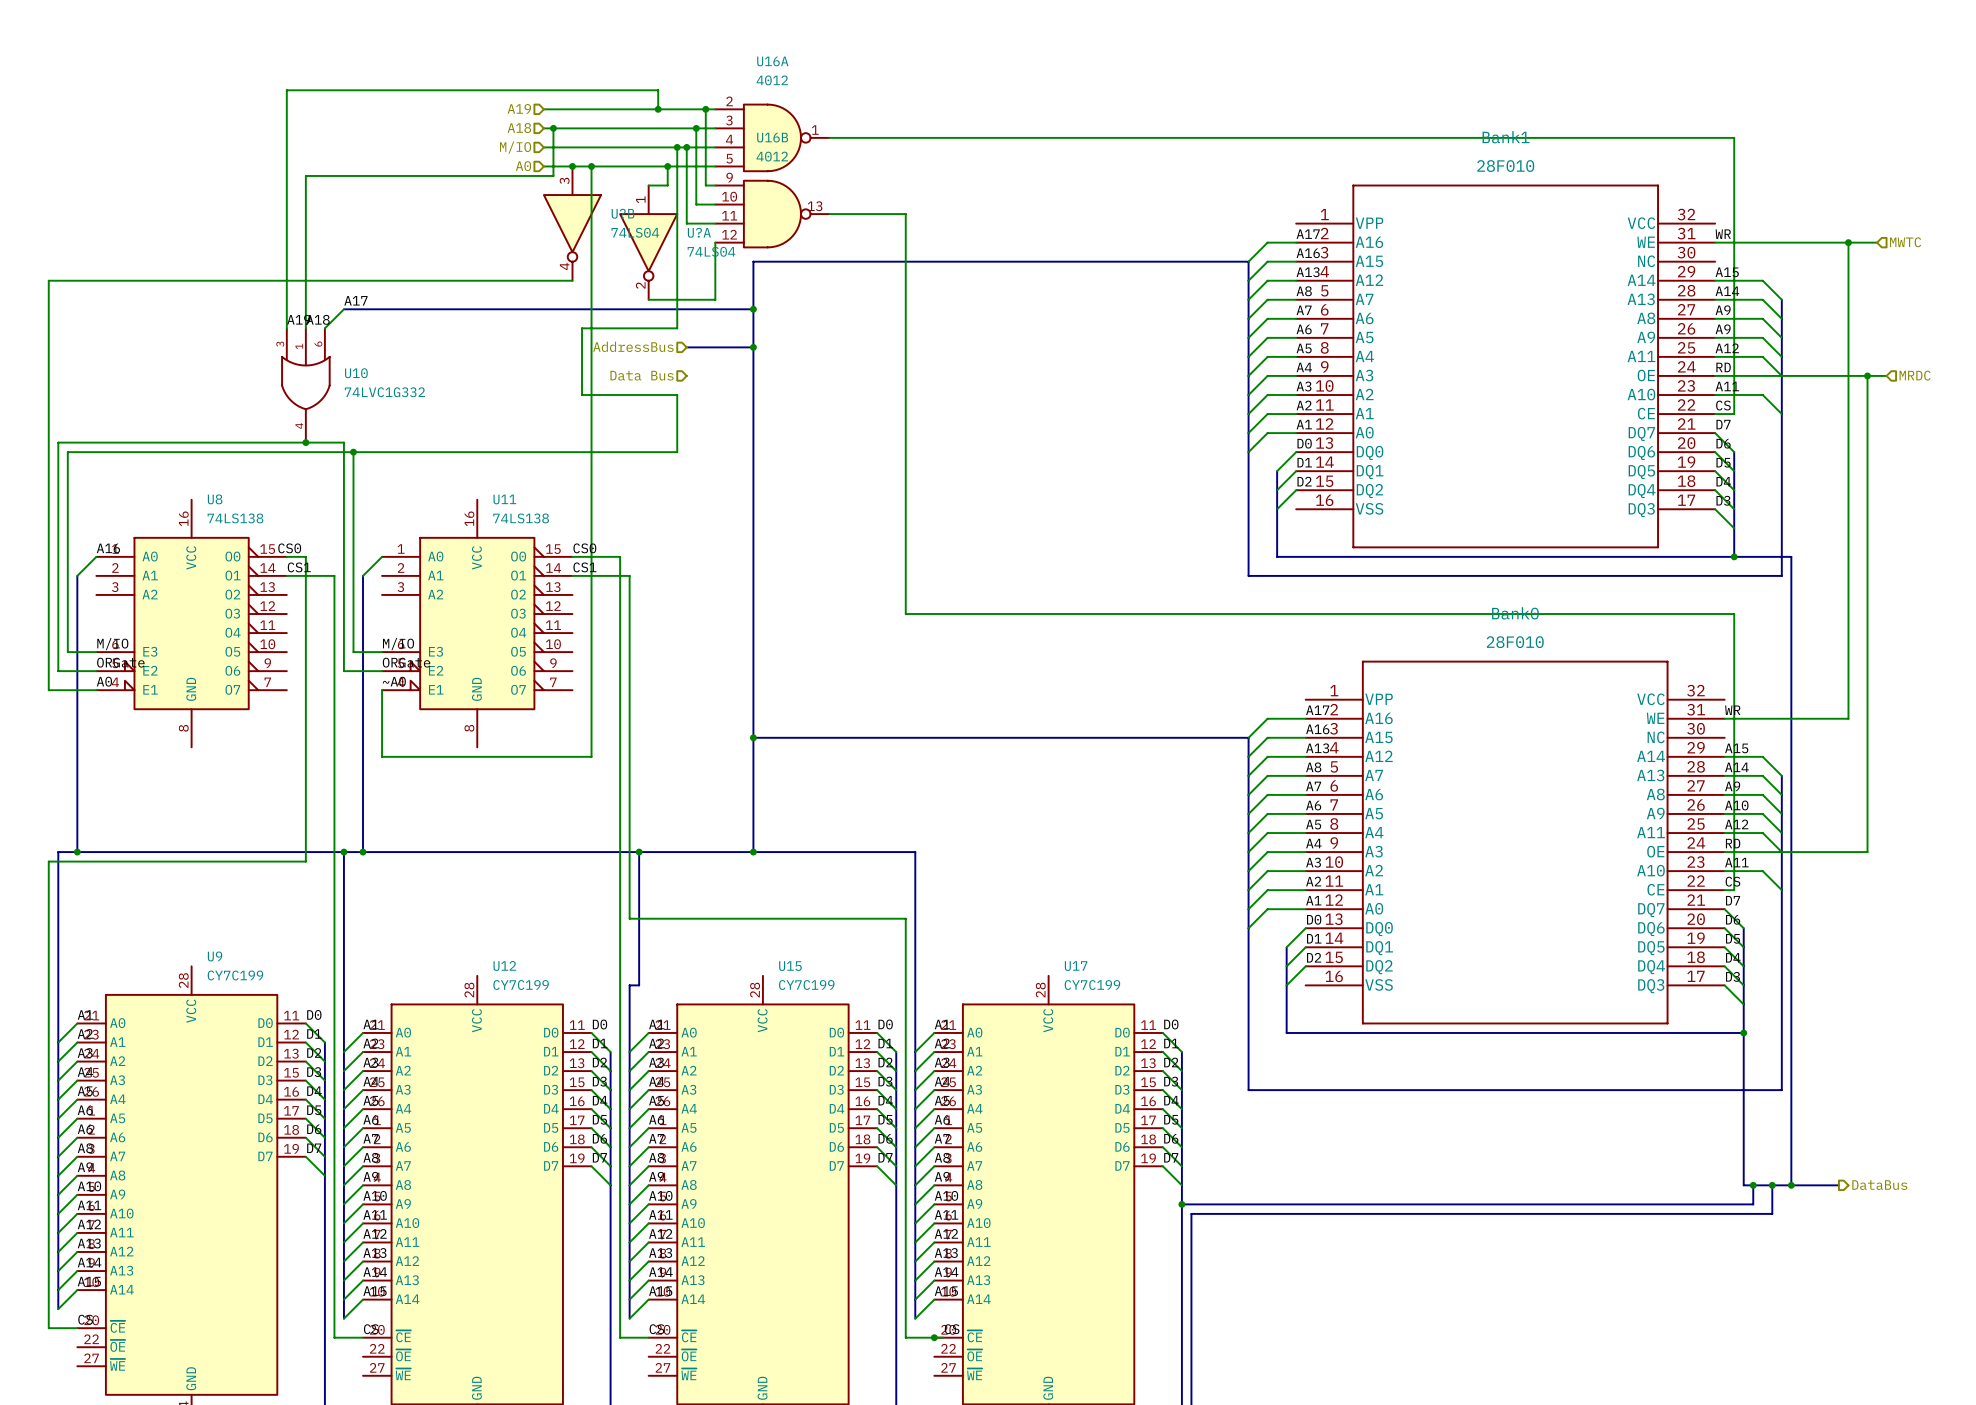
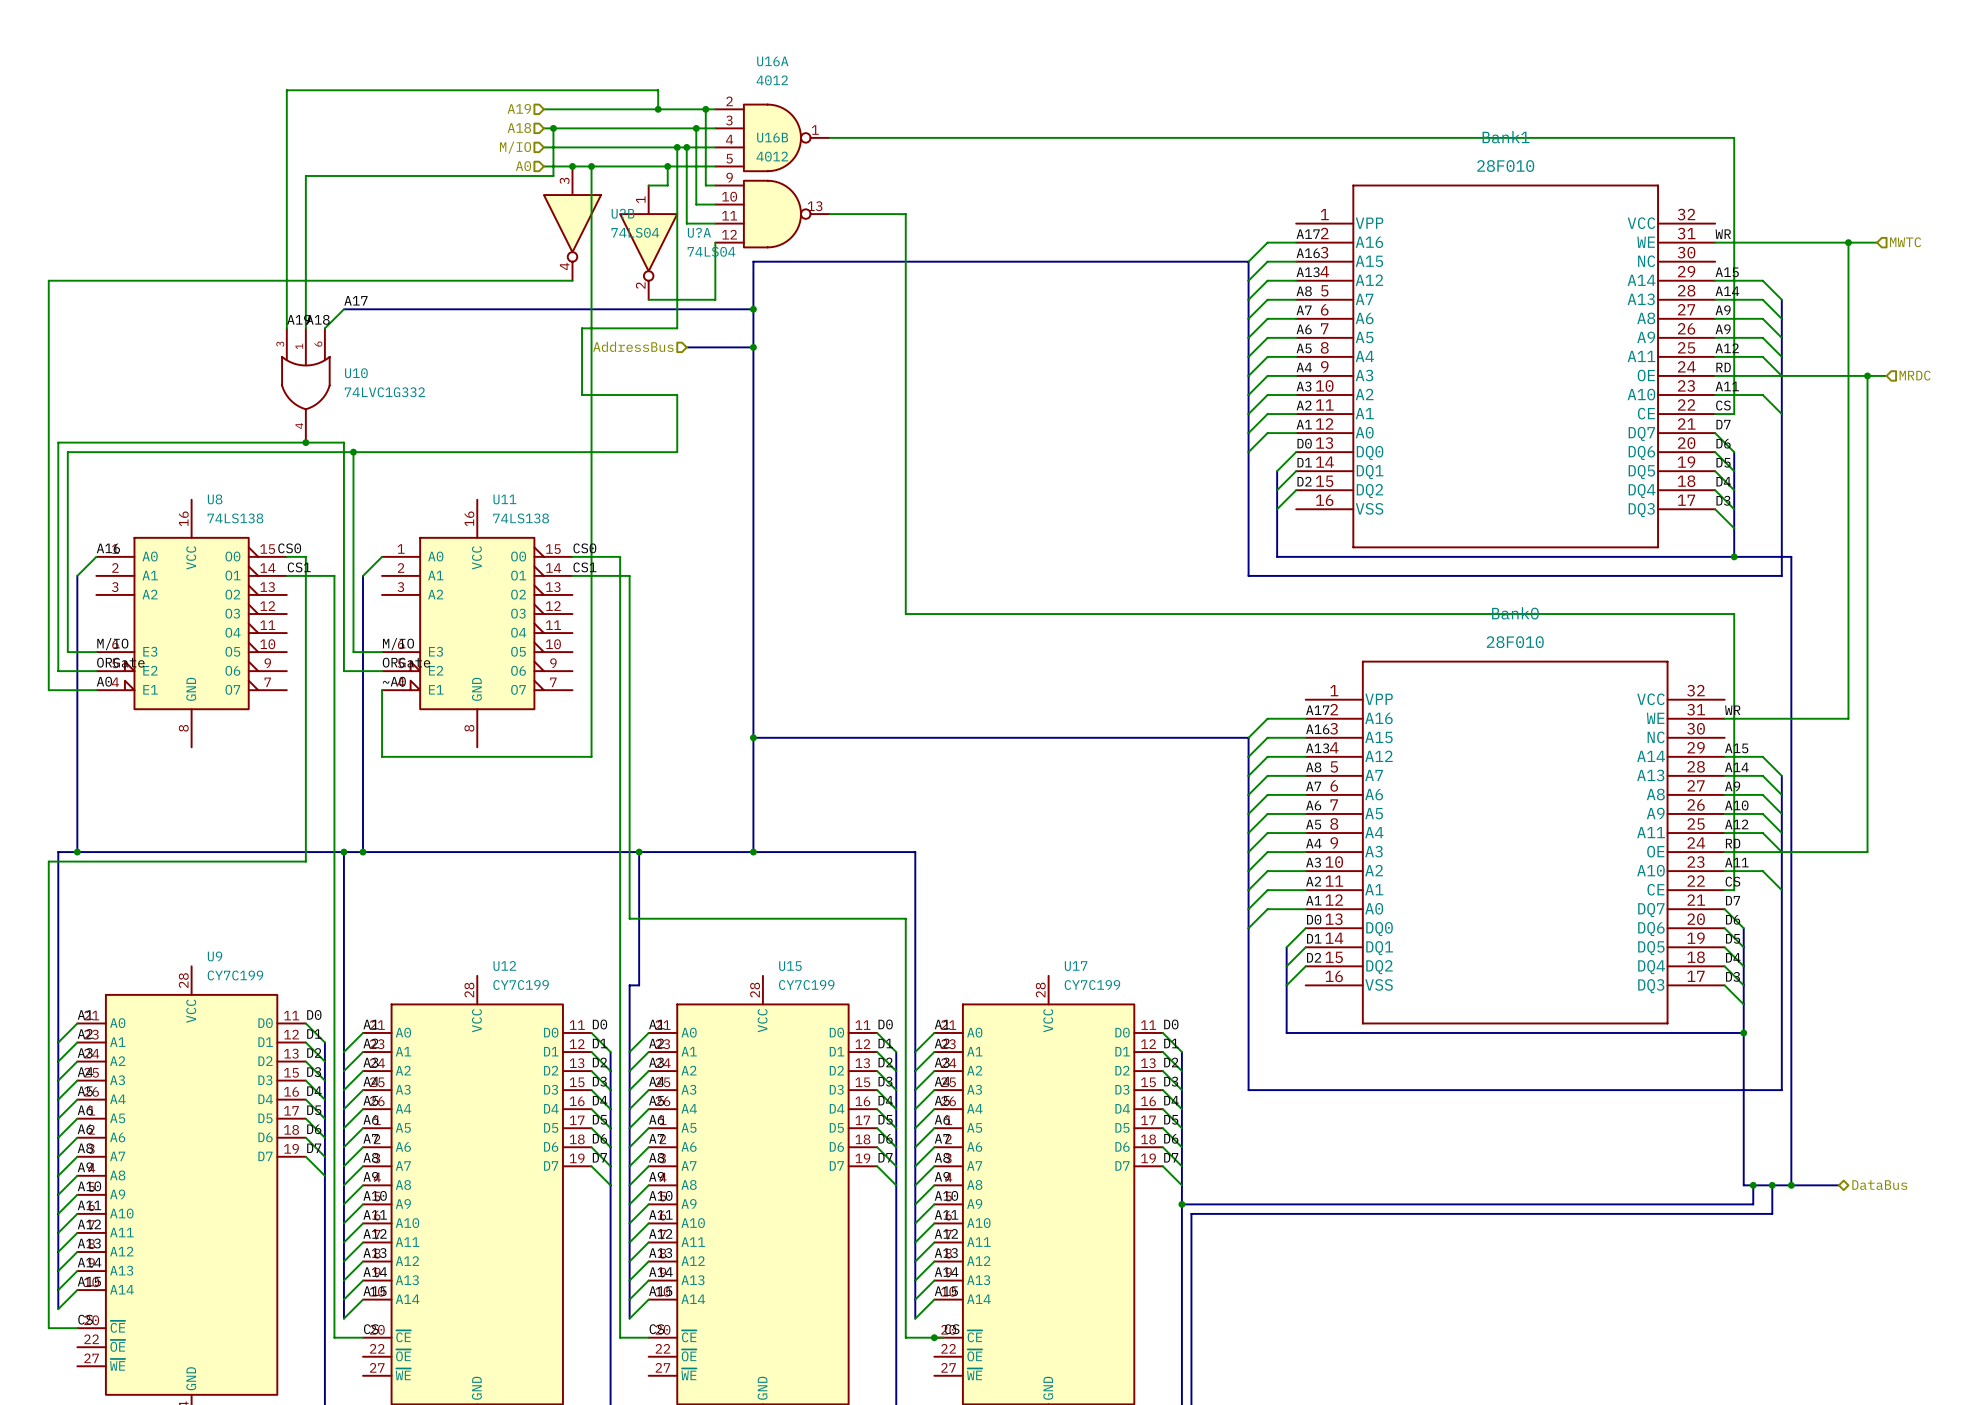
hierarchical label: Data Bus (642, 375) -> none
hierarchical label shape: output (1879, 1185) -> bidirectional (1879, 1185)

